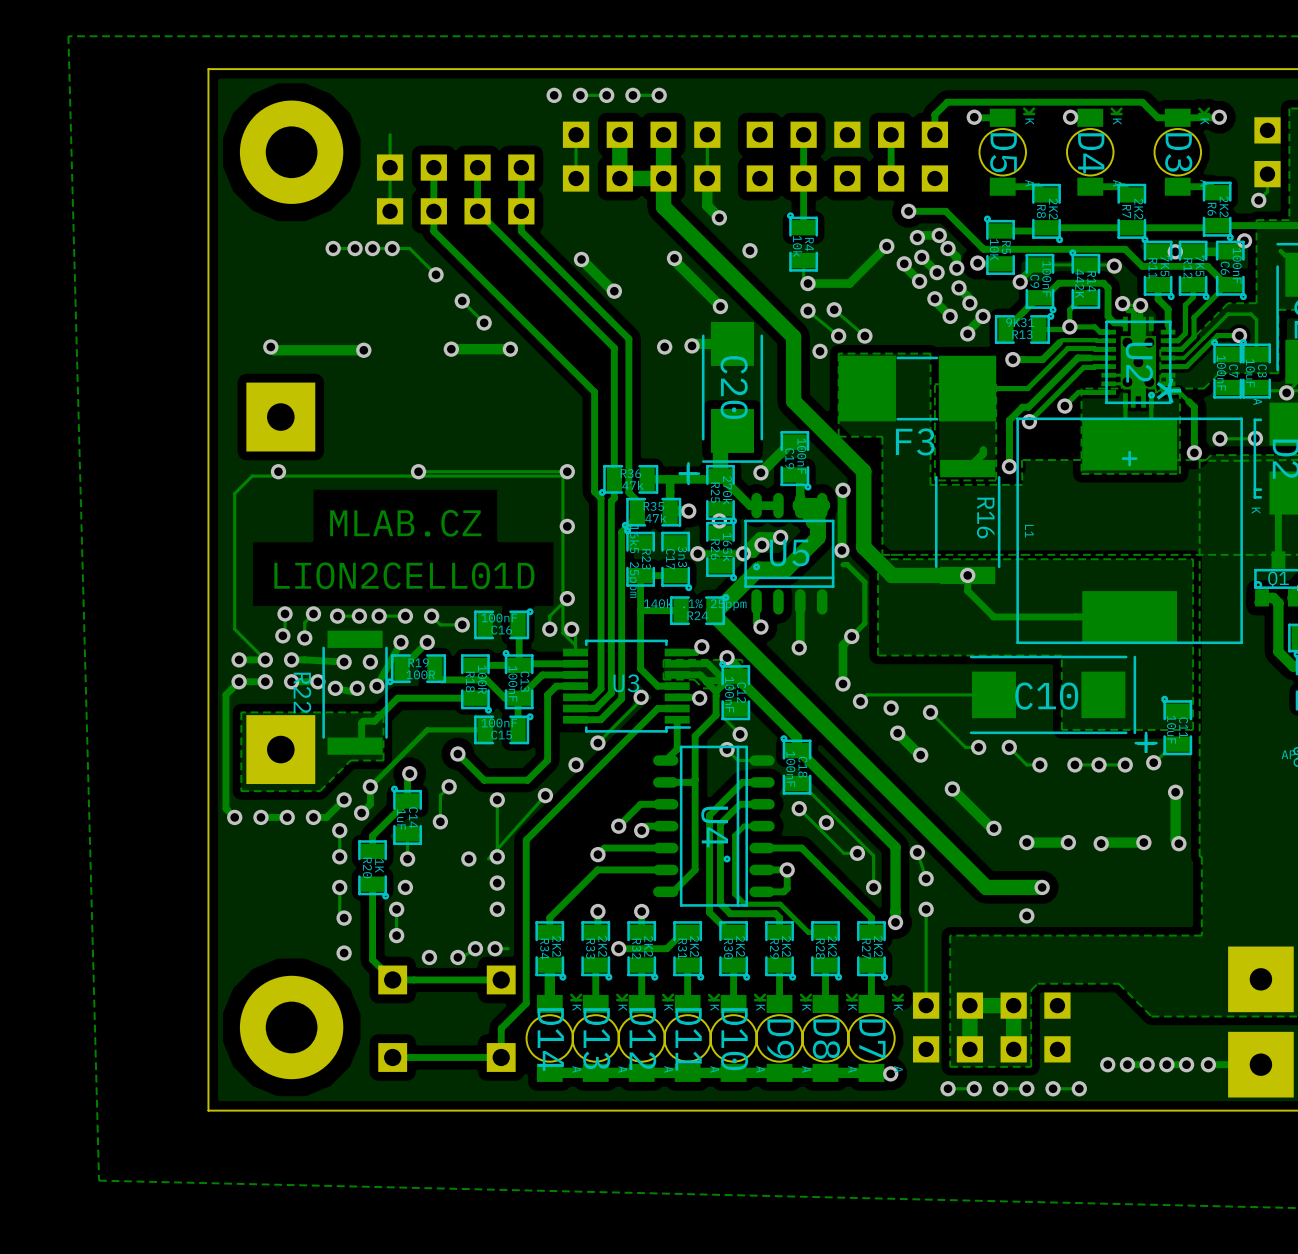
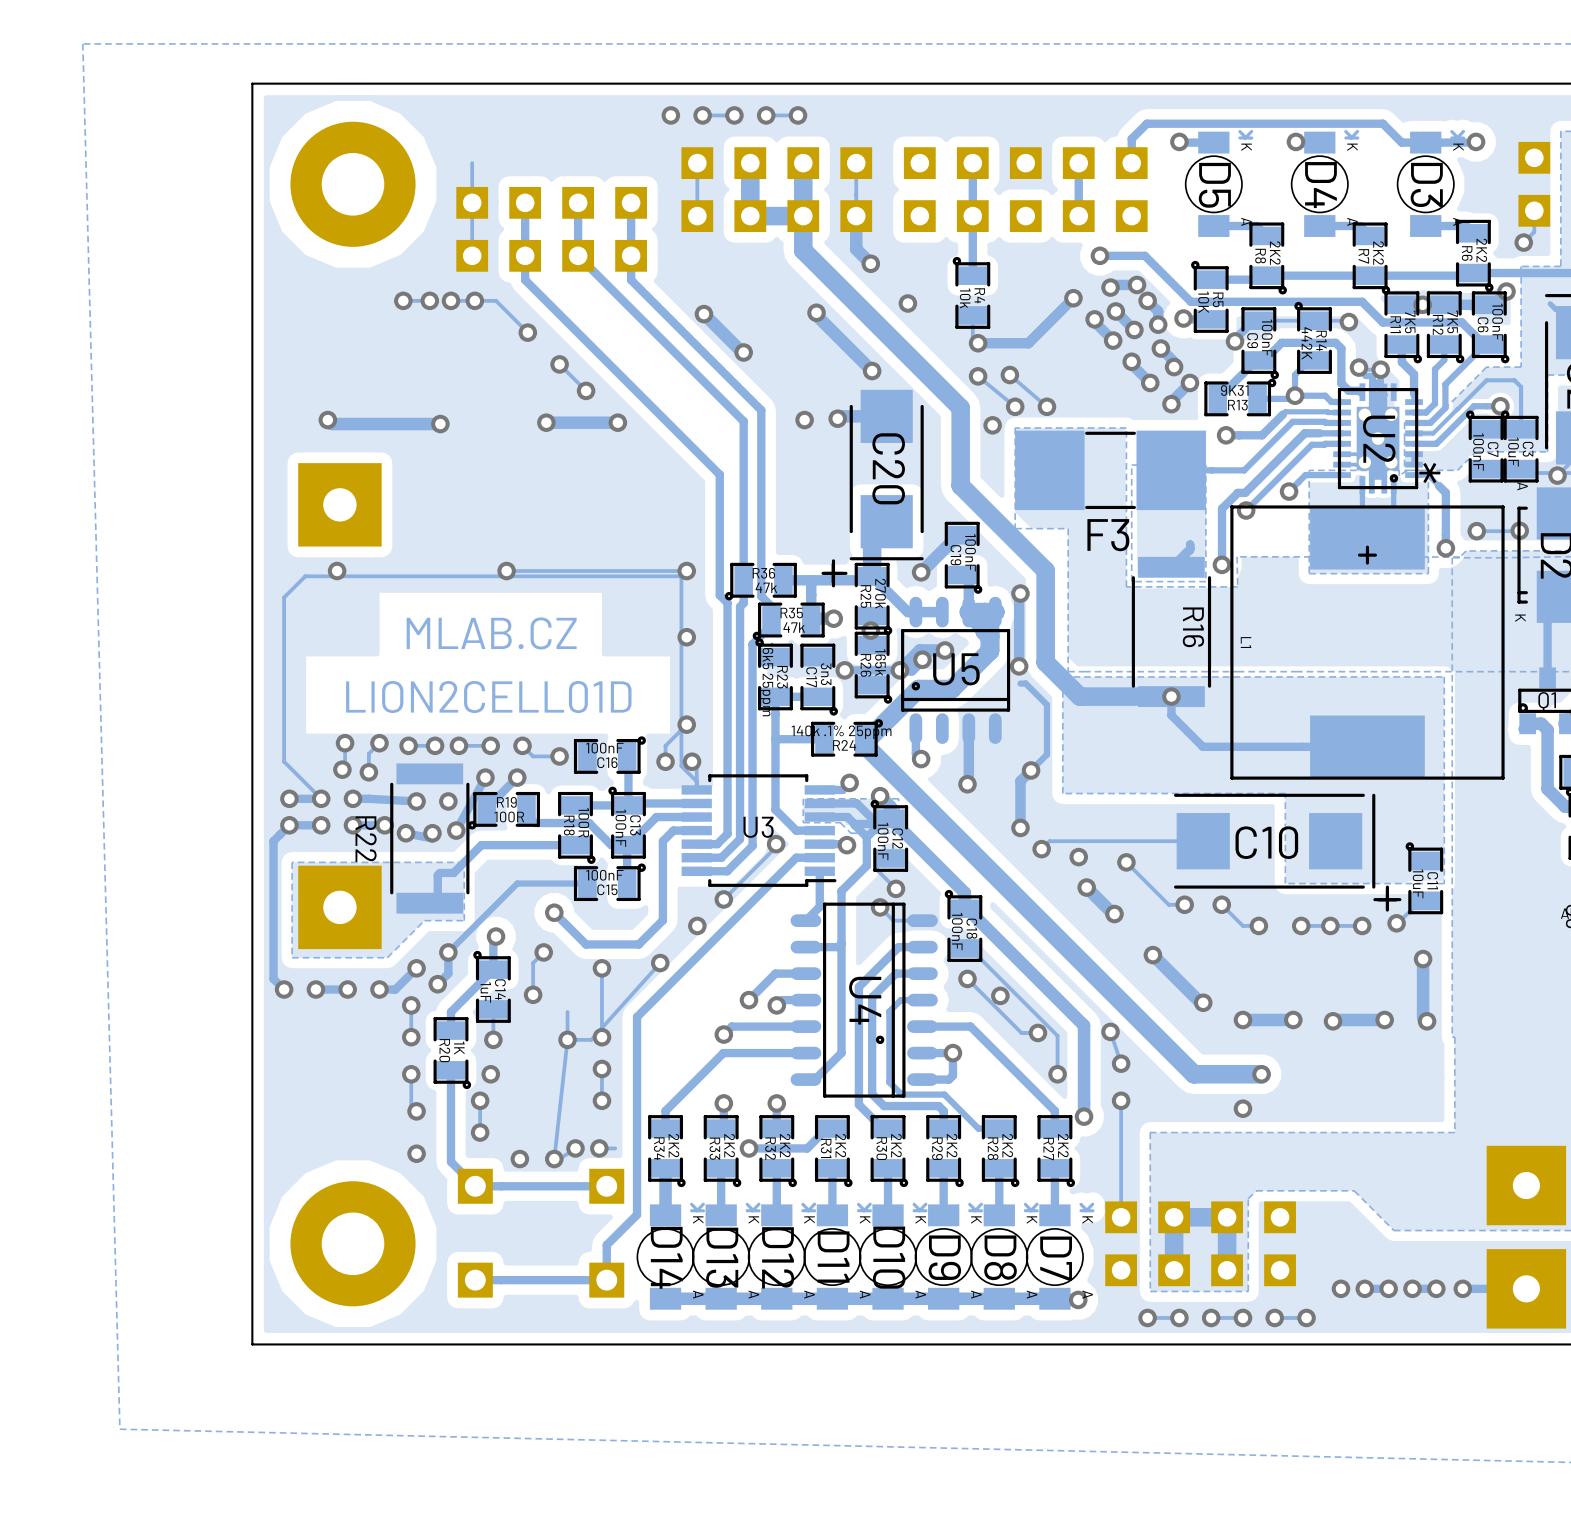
track: none -> (567, 1012) (567, 1039)
track: none -> (567, 1039) (554, 1159)
track: none -> (591, 1039) (567, 1039)
track: none -> (601, 1068) (601, 1100)

